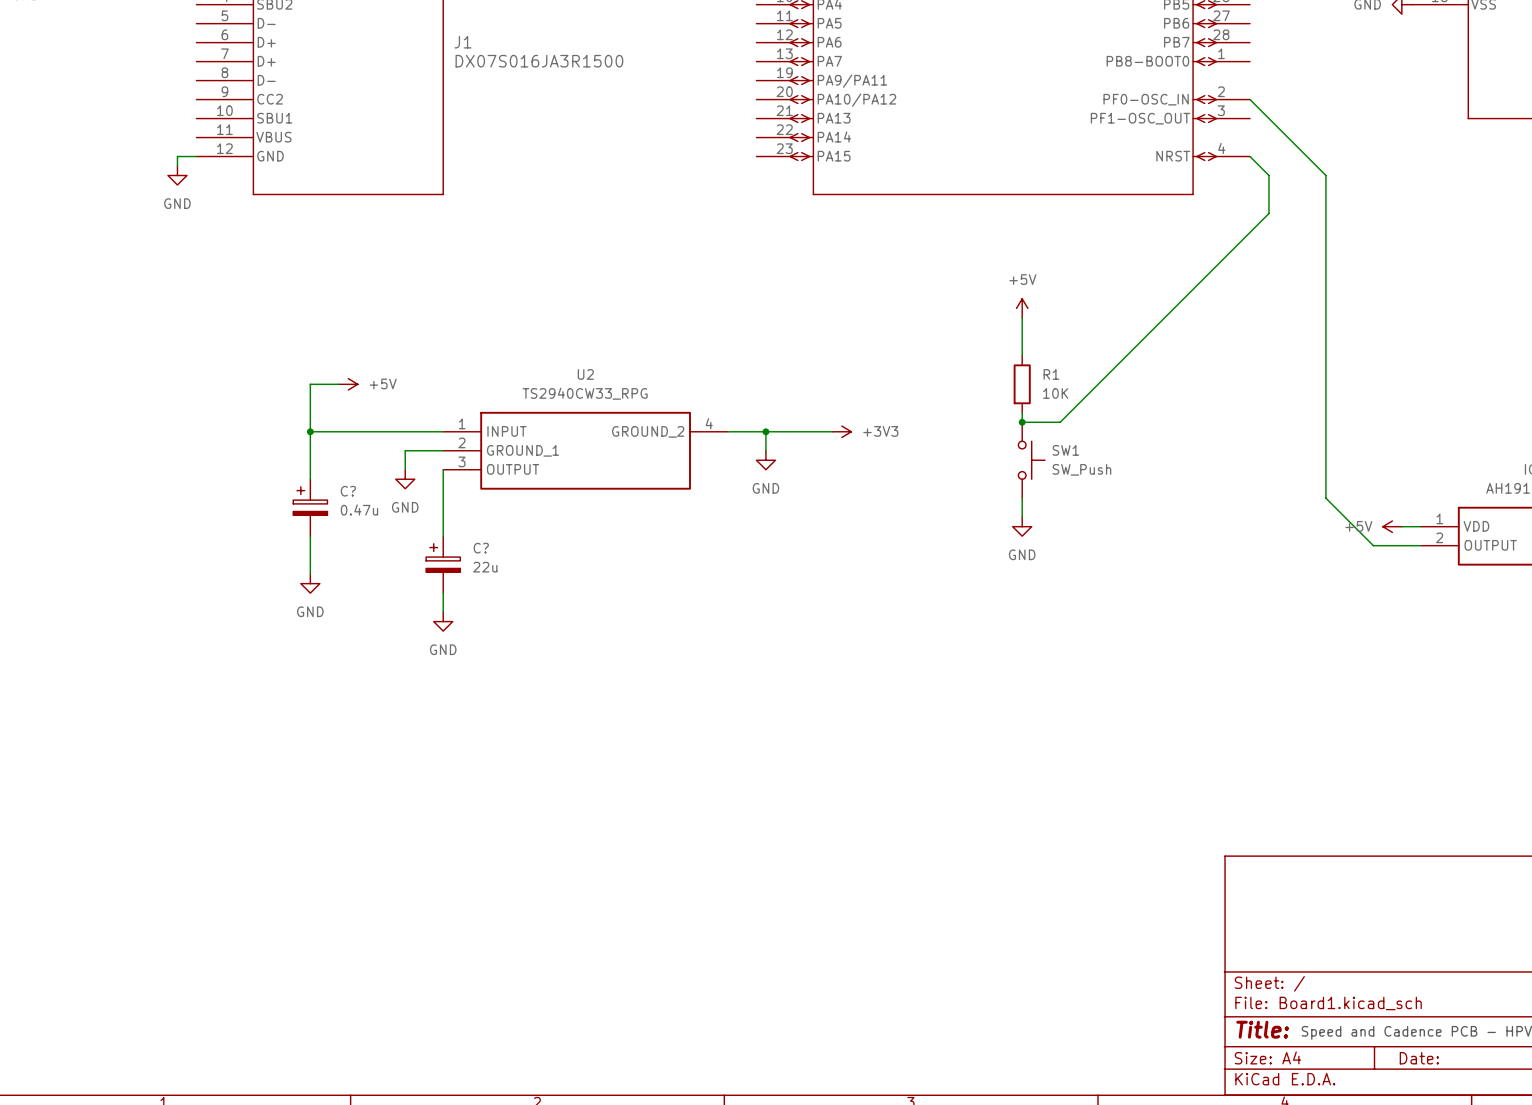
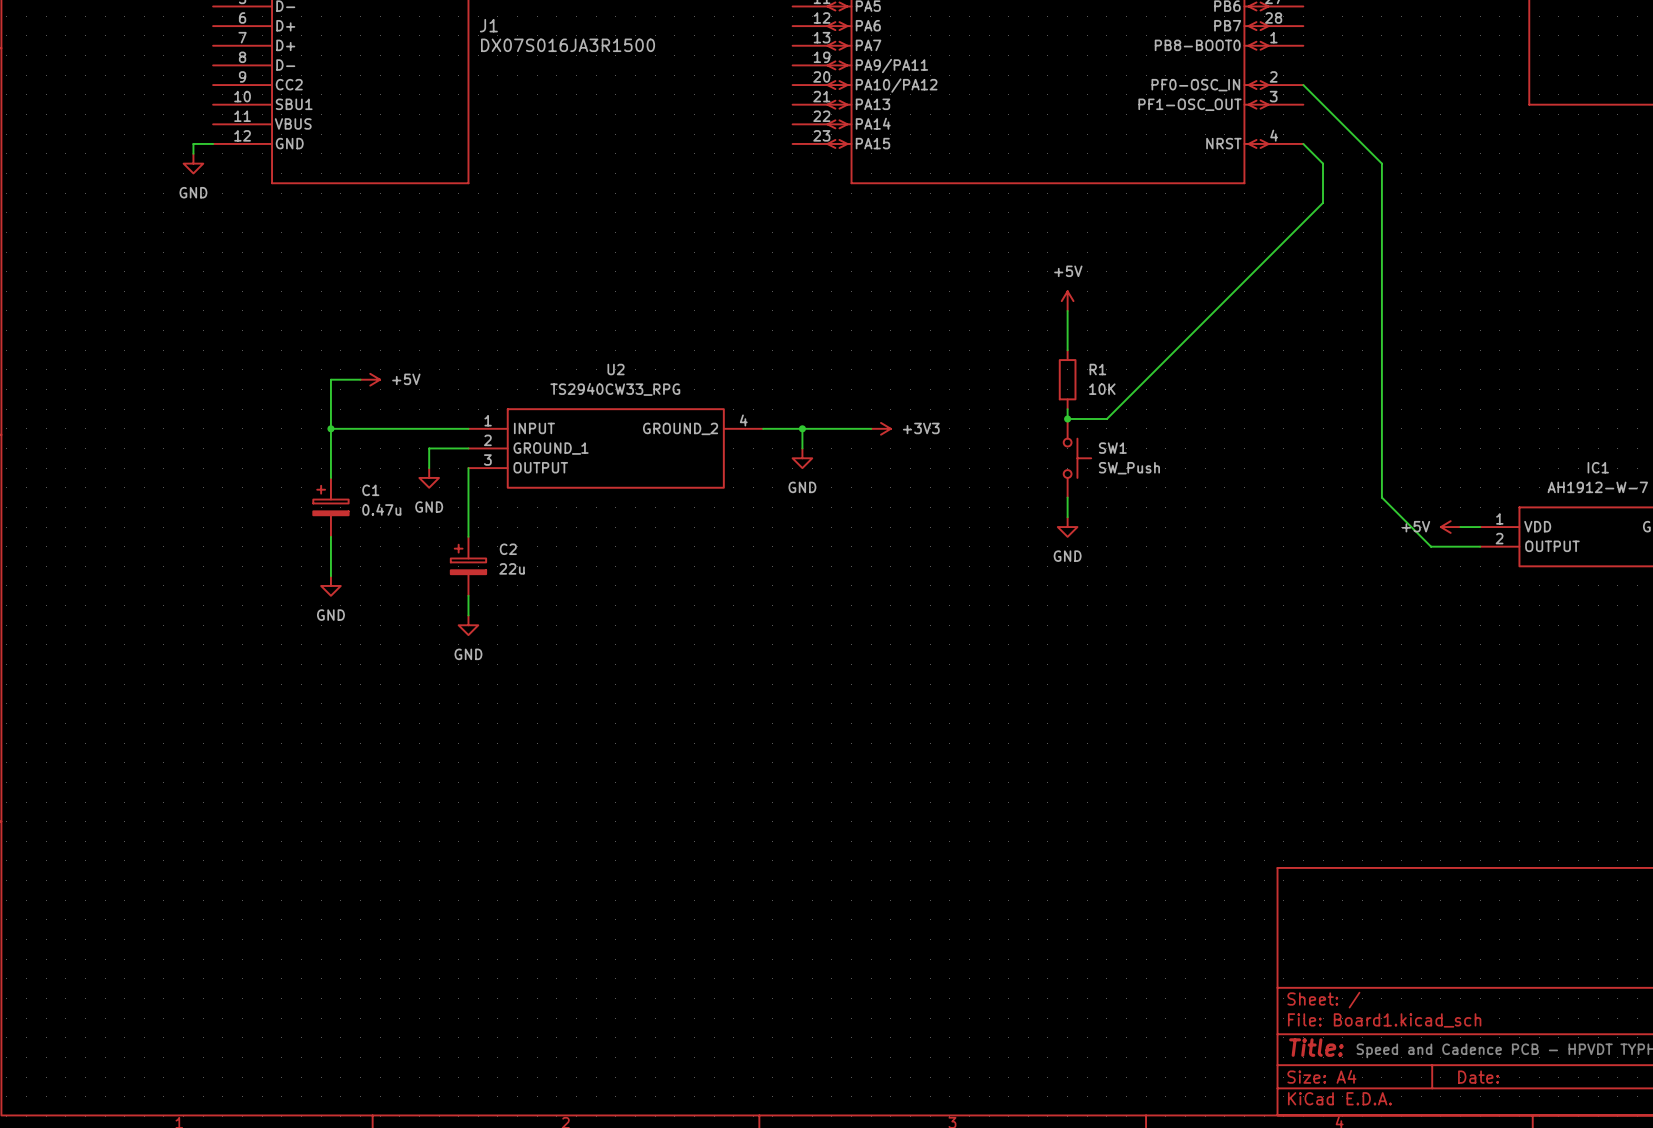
C? name: C? (348, 491) -> C1 (370, 490)
C? name: C? (481, 548) -> C2 (508, 549)

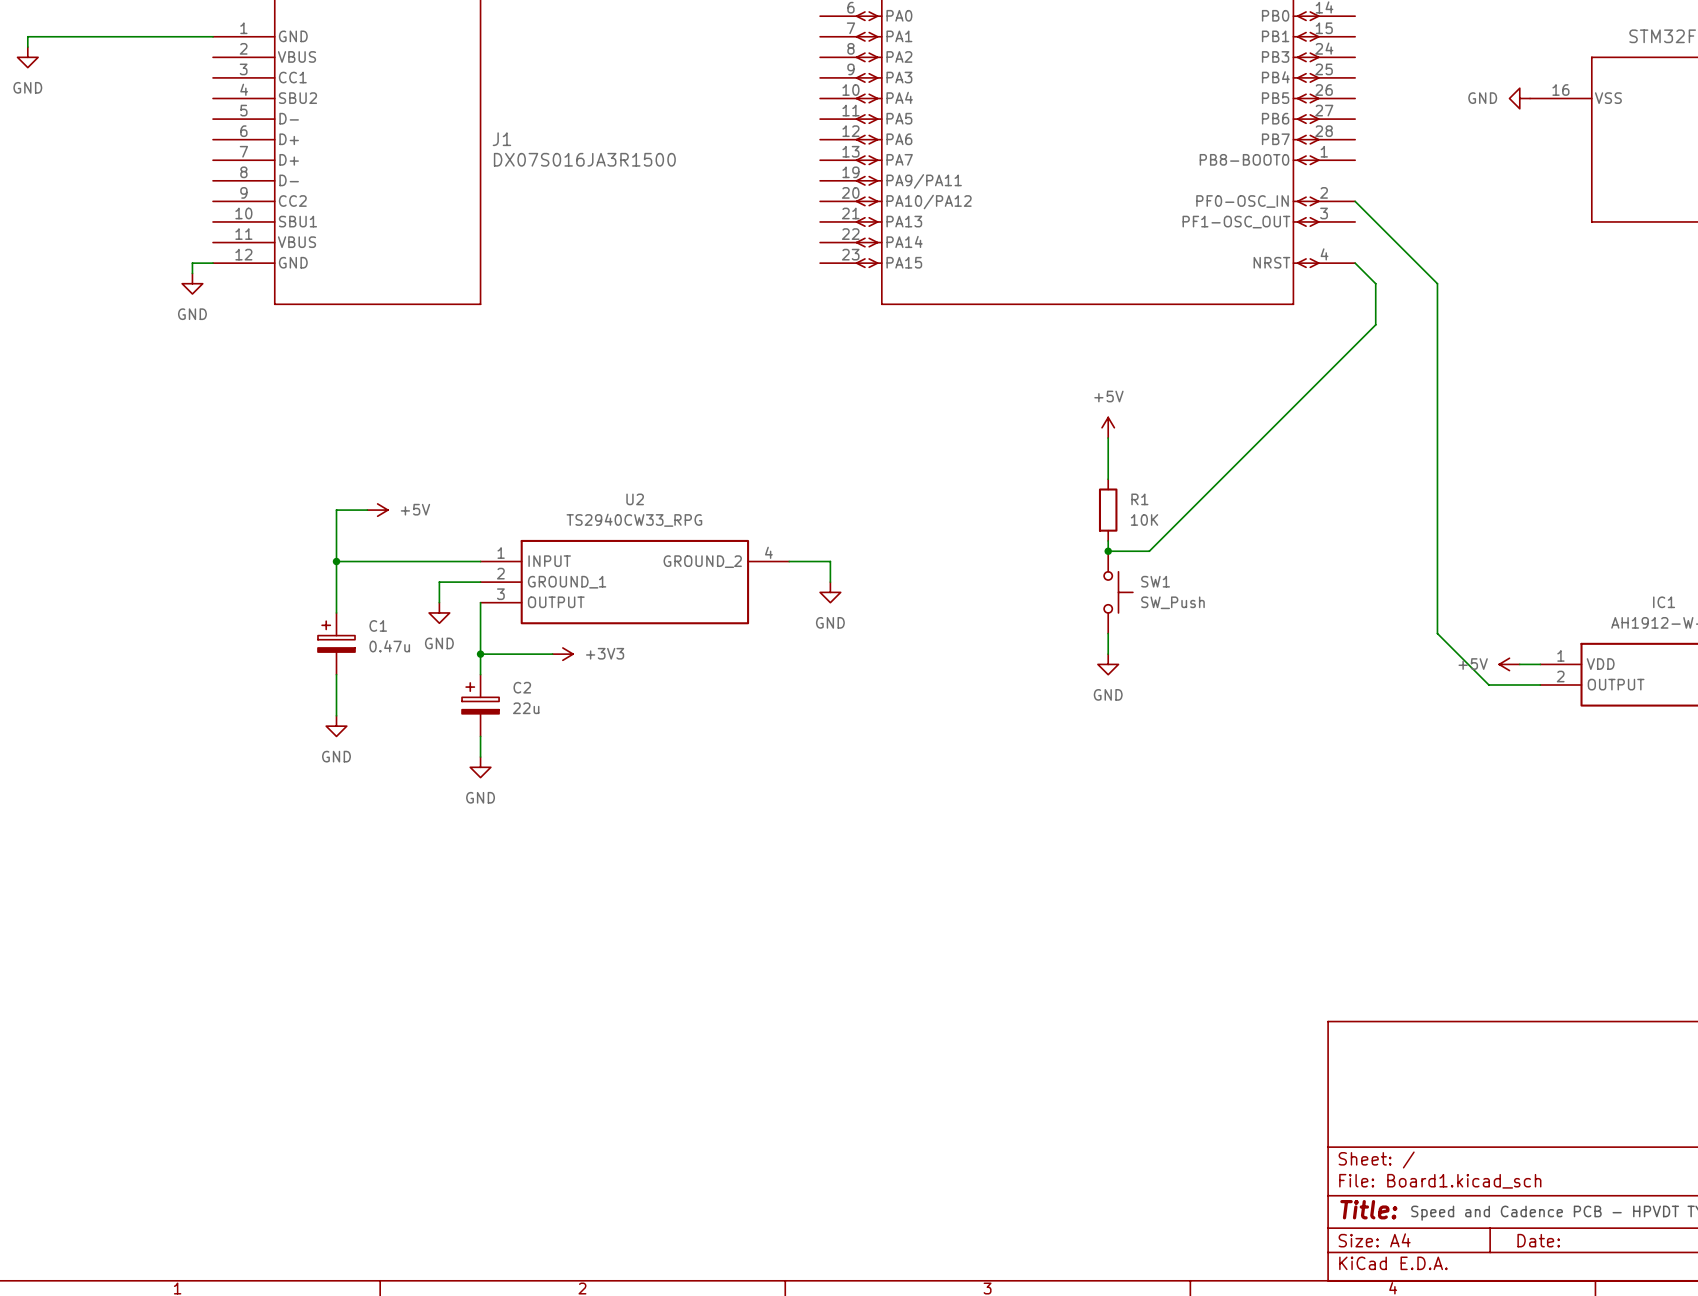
wire: (802, 428) (871, 428) -> none
junction: (802, 428) -> none
power symbol: +3V3 (881, 428) -> none
wire: none -> (480, 654) (552, 654)
junction: none -> (480, 654)
power symbol: none -> +3V3 (562, 654)

